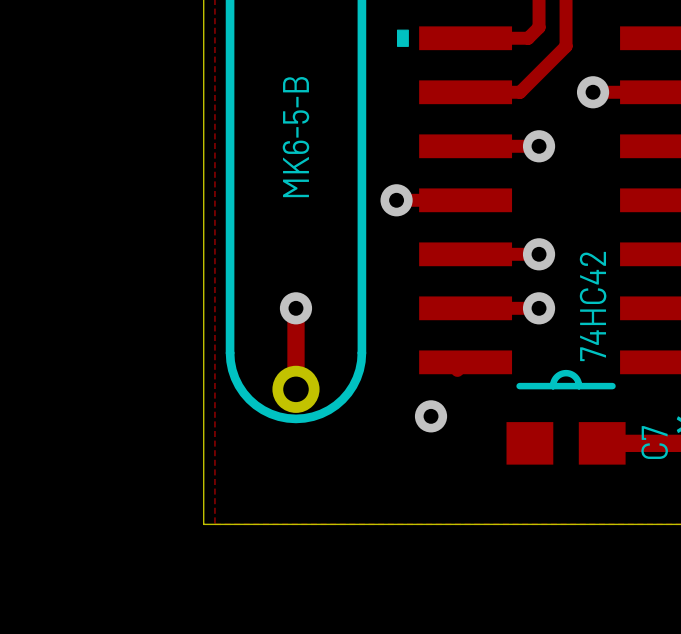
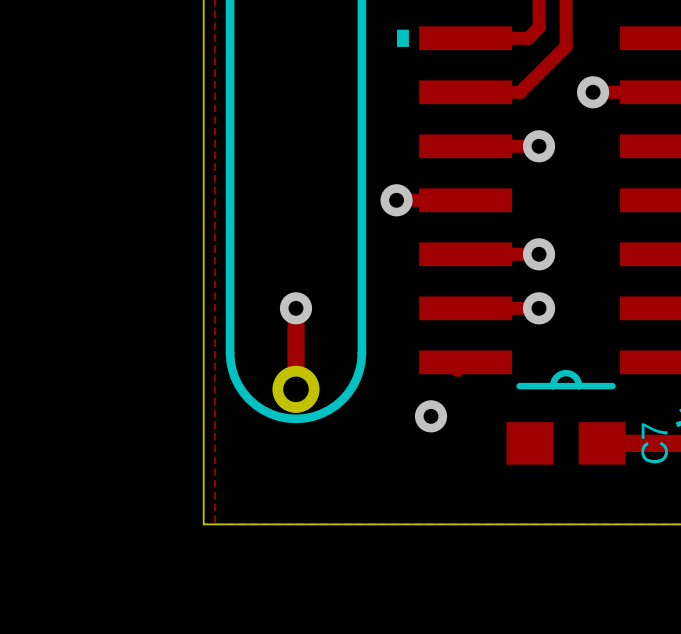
text: MK6-5-B (295, 137) -> none
text: 74HC42 (593, 306) -> none

